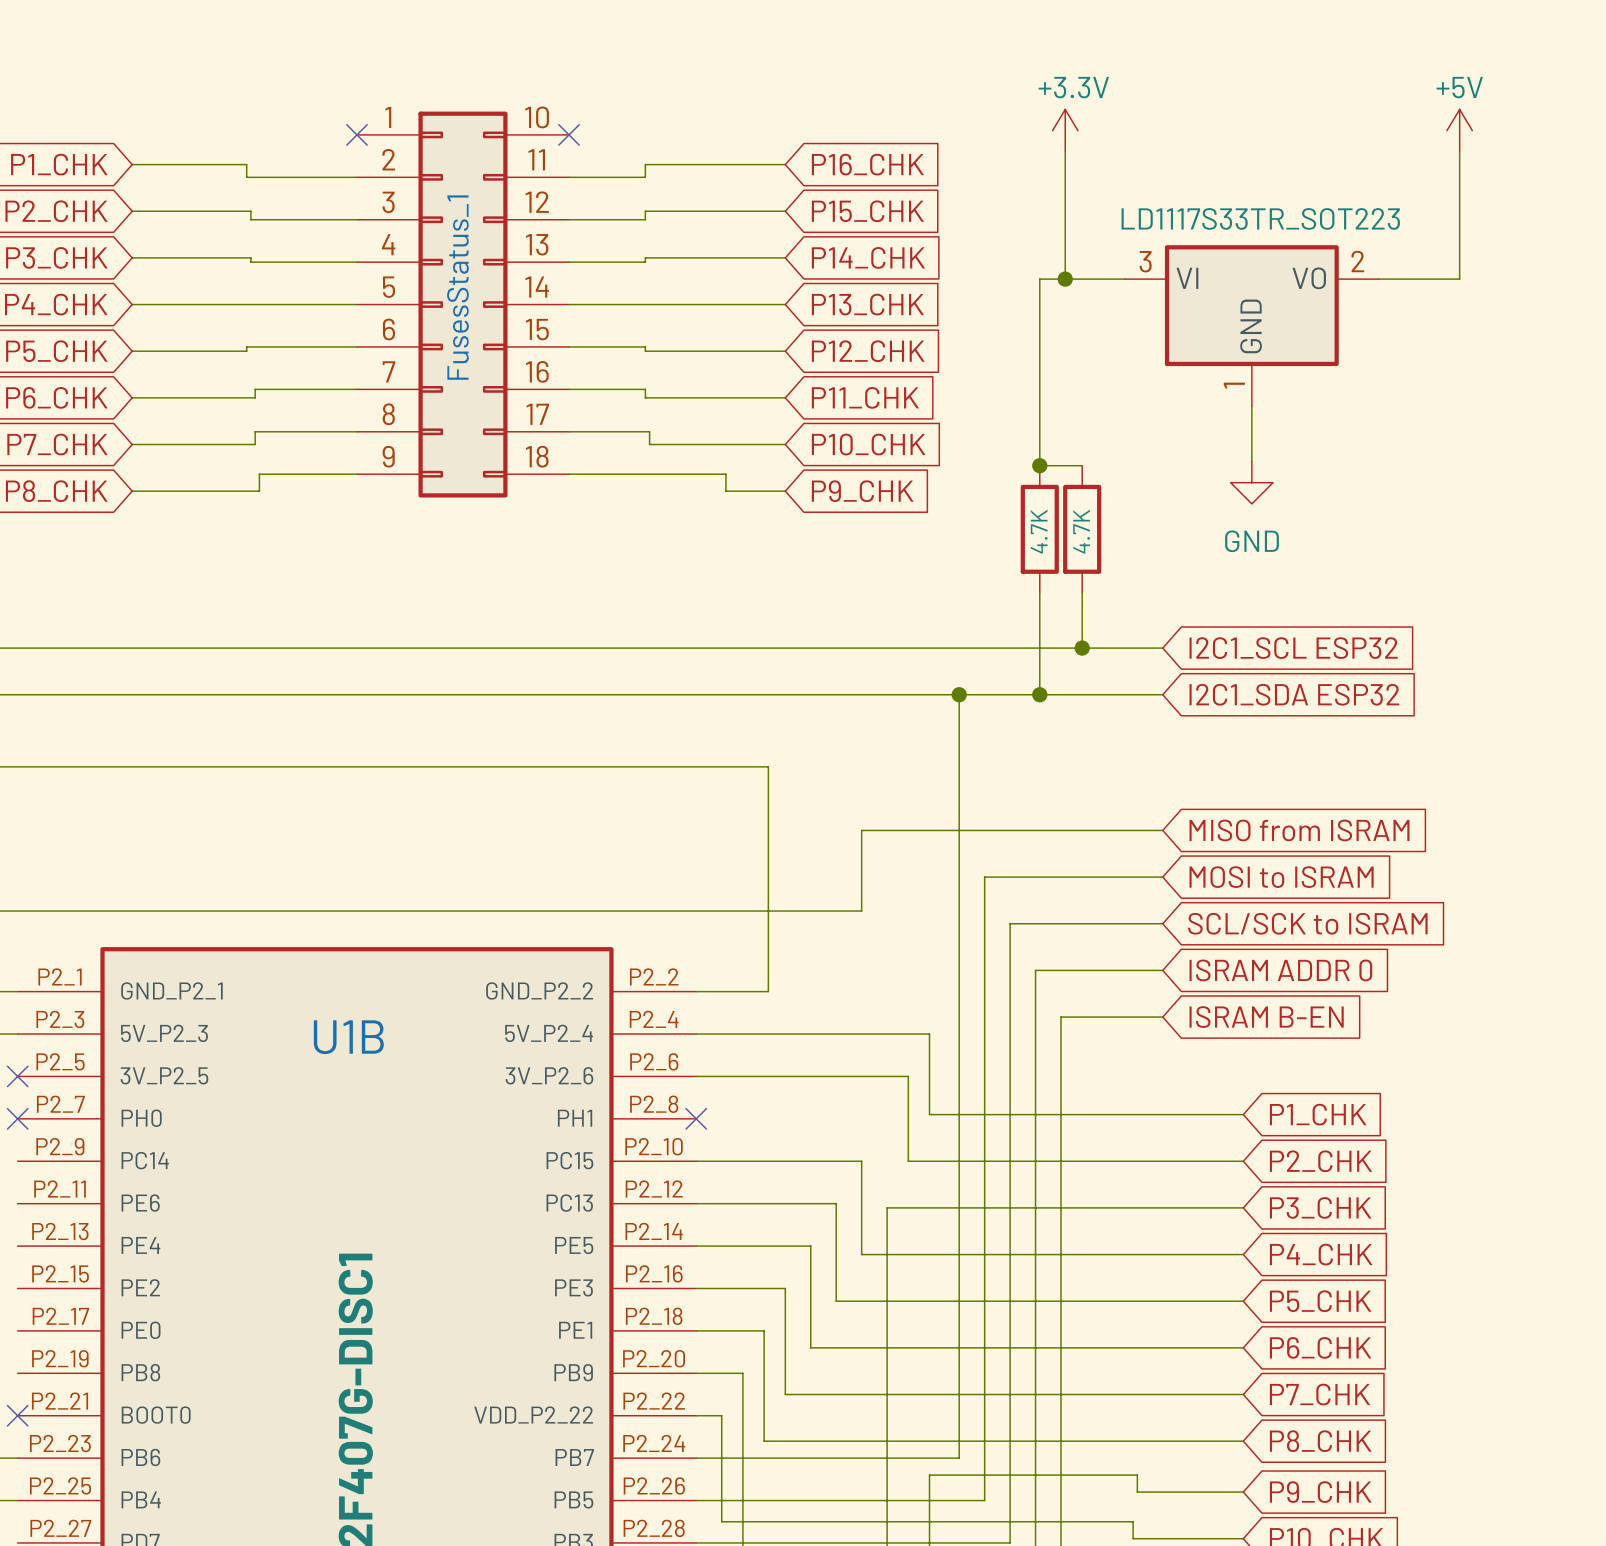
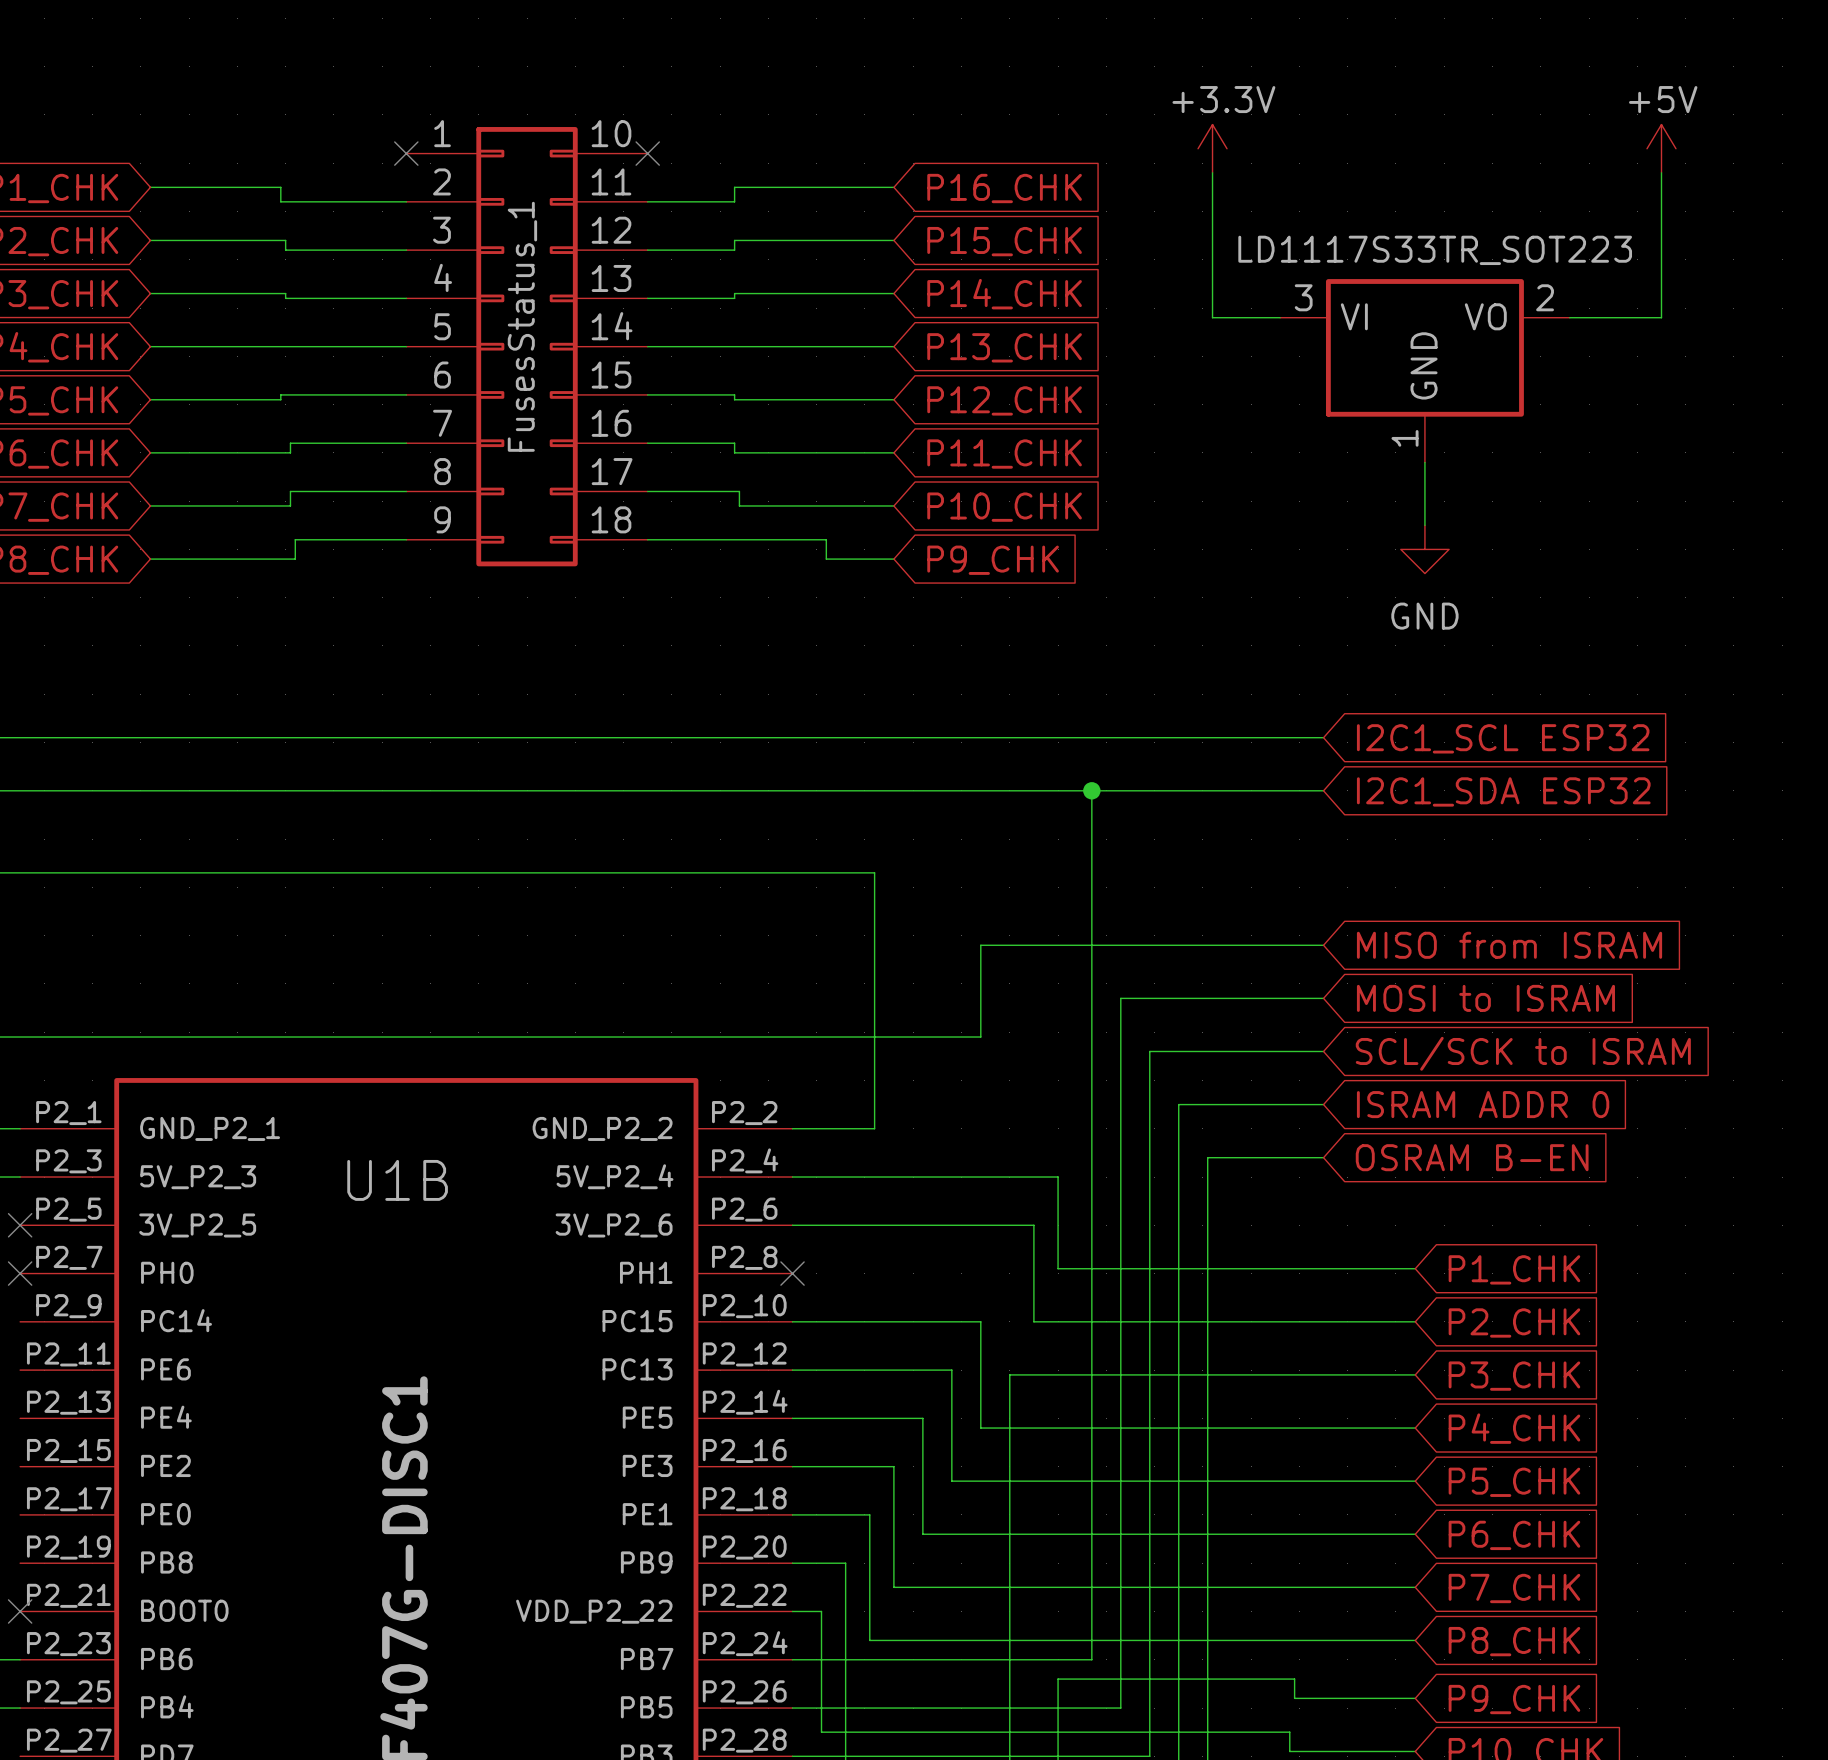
wire: (1065, 279) (1039, 279) (1039, 465) (1082, 465) -> none
junction: (1065, 279) -> none
junction: (1039, 465) -> none
part: 4.7K (1039, 529) -> none
part: 4.7K (1082, 529) -> none
wire: (1039, 592) (1039, 694) -> none
wire: (1082, 592) (1082, 648) -> none
junction: (1082, 648) -> none
junction: (1039, 694) -> none
global label: ISRAM B-EN (1266, 1017) -> OSRAM B-EN (1472, 1157)

